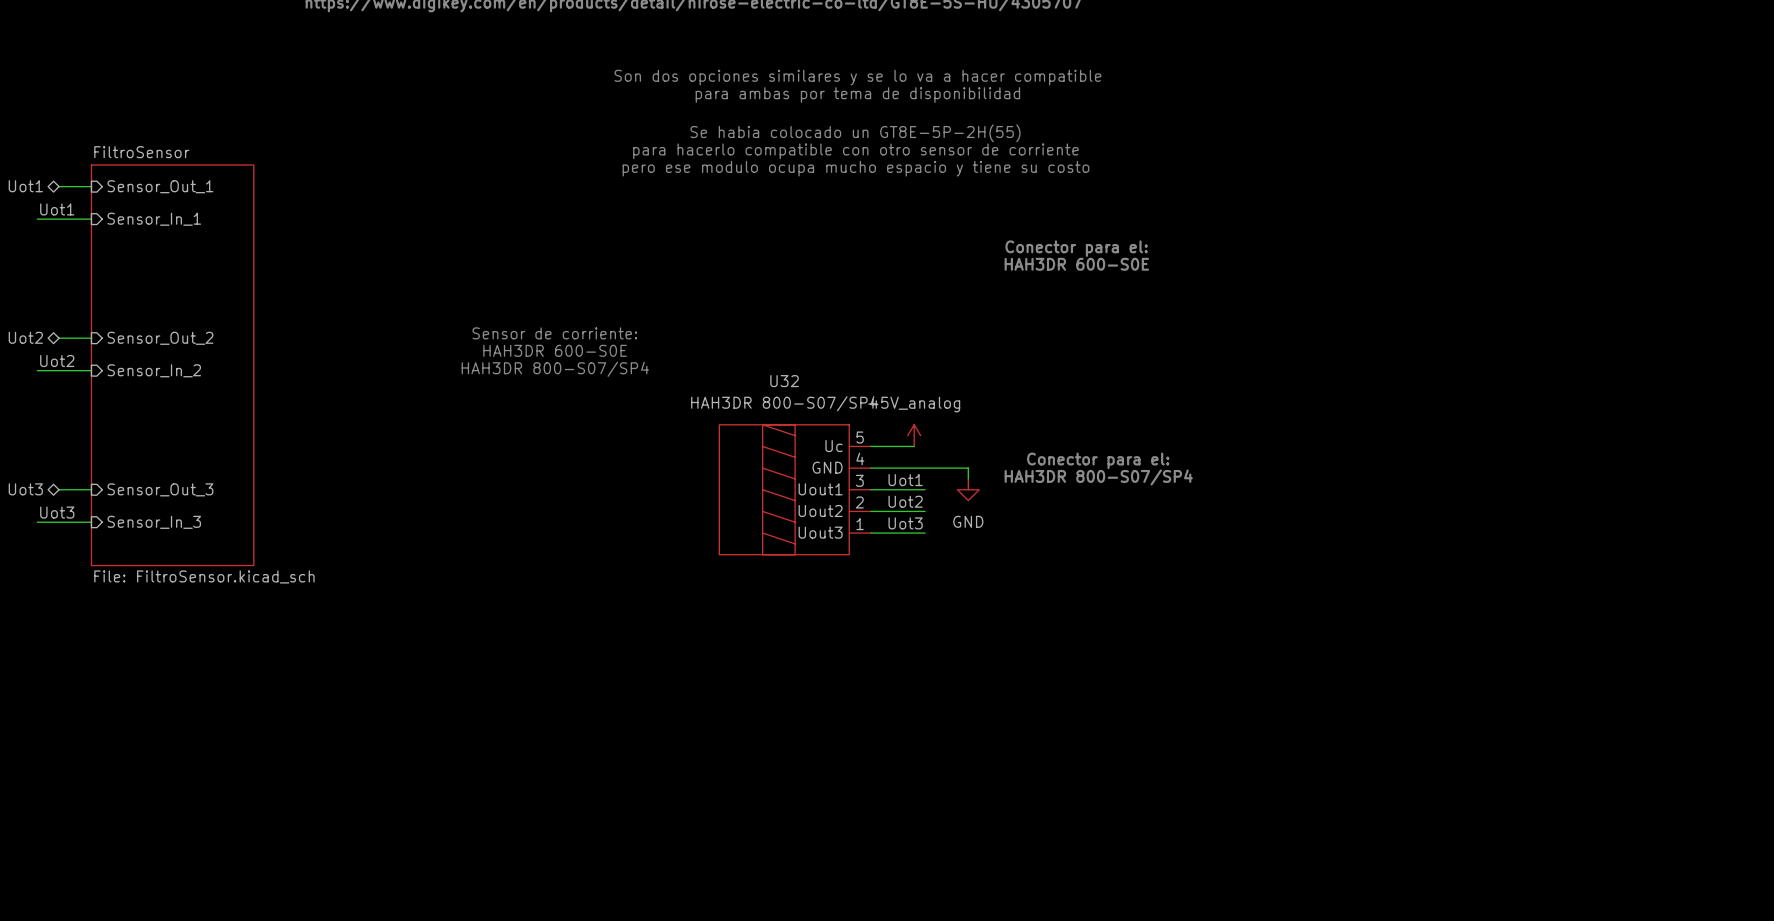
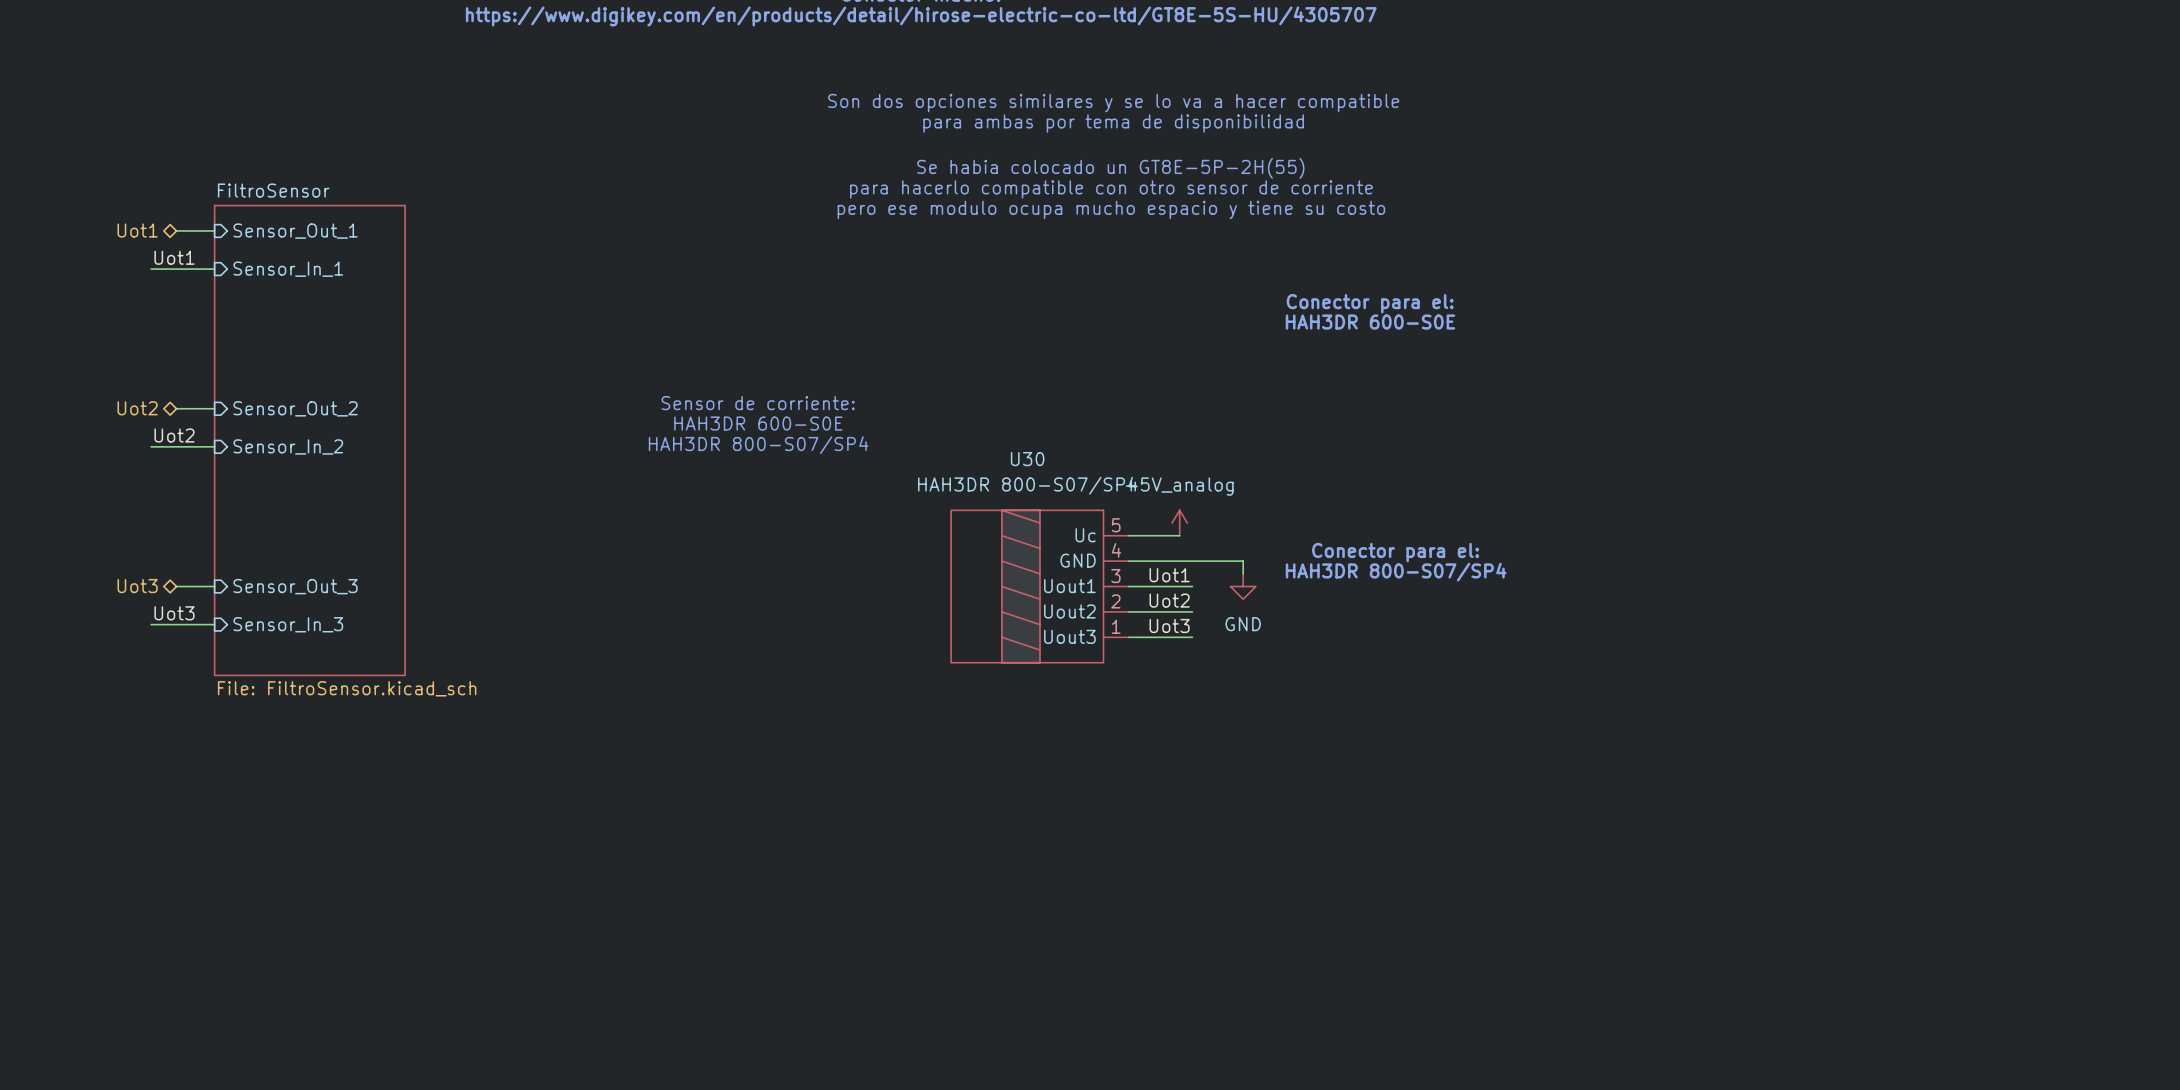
U32 name: U32 (784, 381) -> U30 (1027, 459)

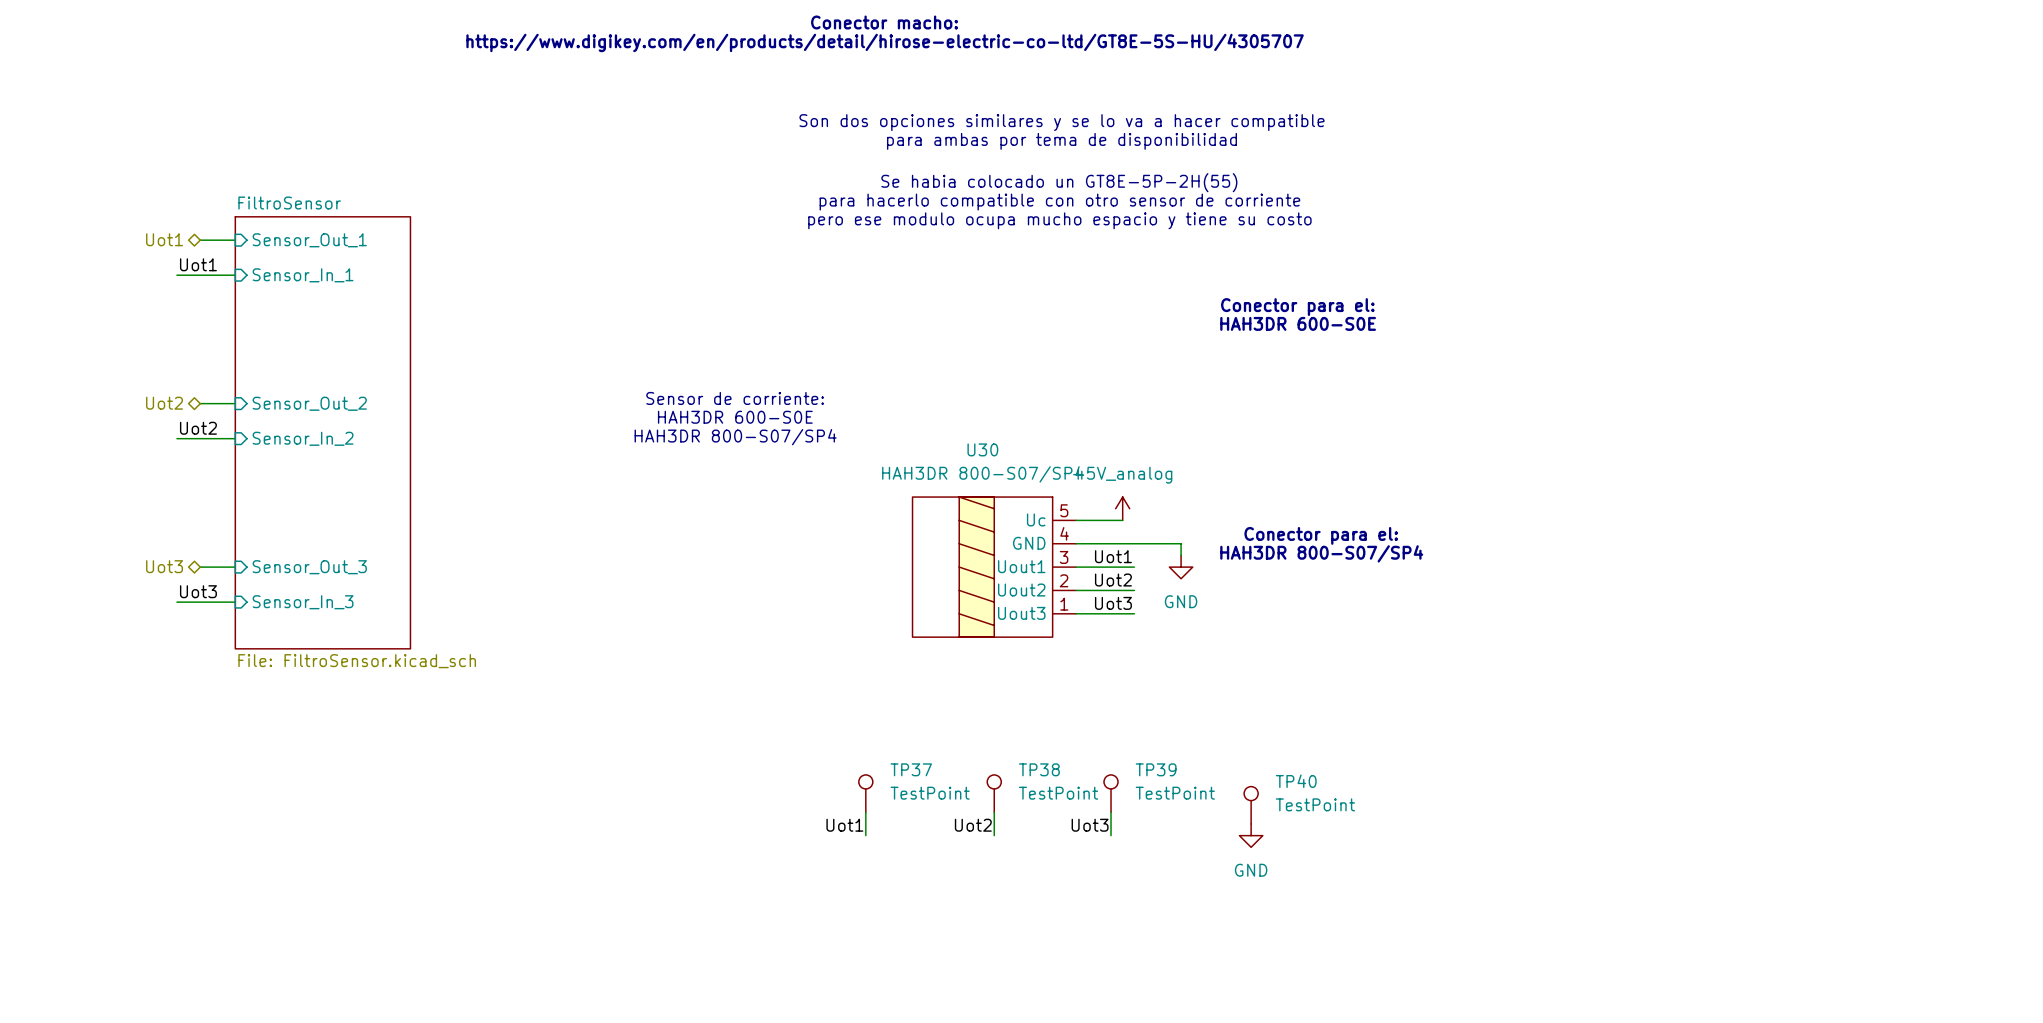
TP37: none -> TestPoint (865, 793)
TP38: none -> TestPoint (994, 793)
TP39: none -> TestPoint (1111, 793)
TP40: none -> TestPoint (1251, 805)
wire: none -> (865, 812) (865, 835)
wire: none -> (994, 812) (994, 835)
wire: none -> (1111, 812) (1111, 835)
label: none -> Uot1 (844, 825)
label: none -> Uot2 (973, 825)
label: none -> Uot3 (1090, 825)
power symbol: none -> GND (1251, 835)

